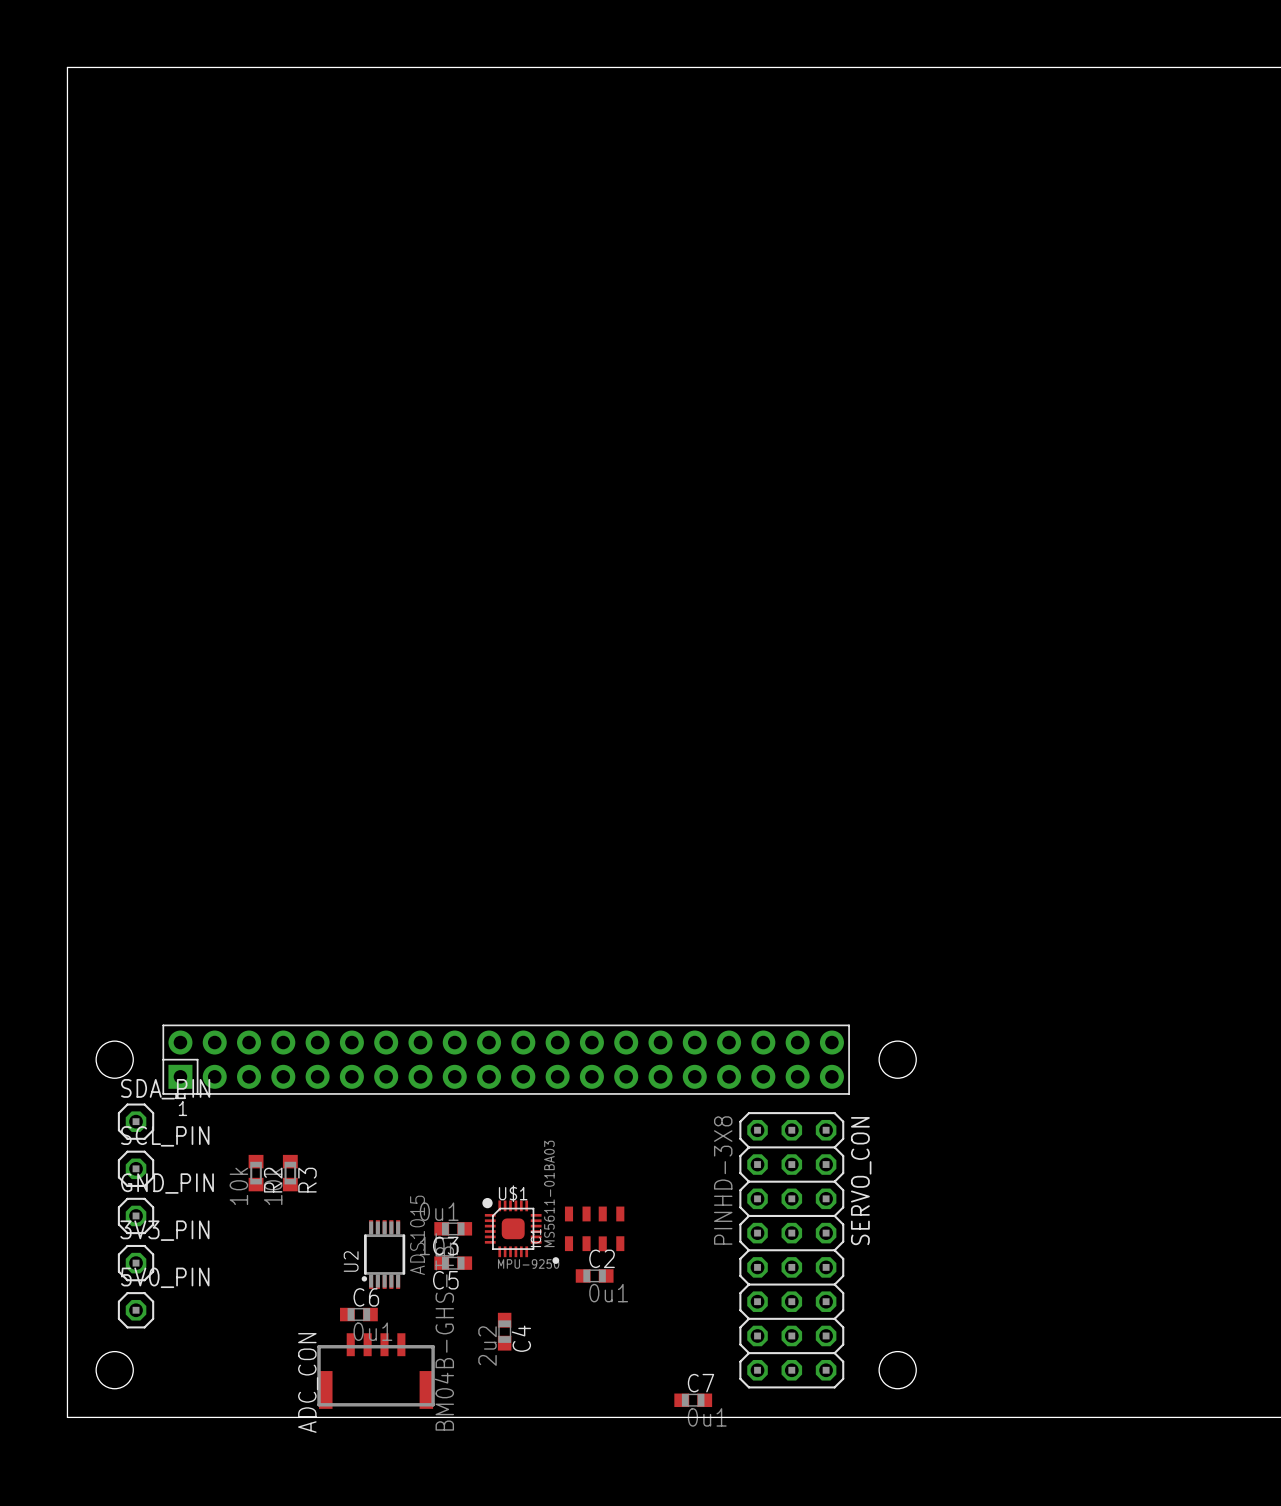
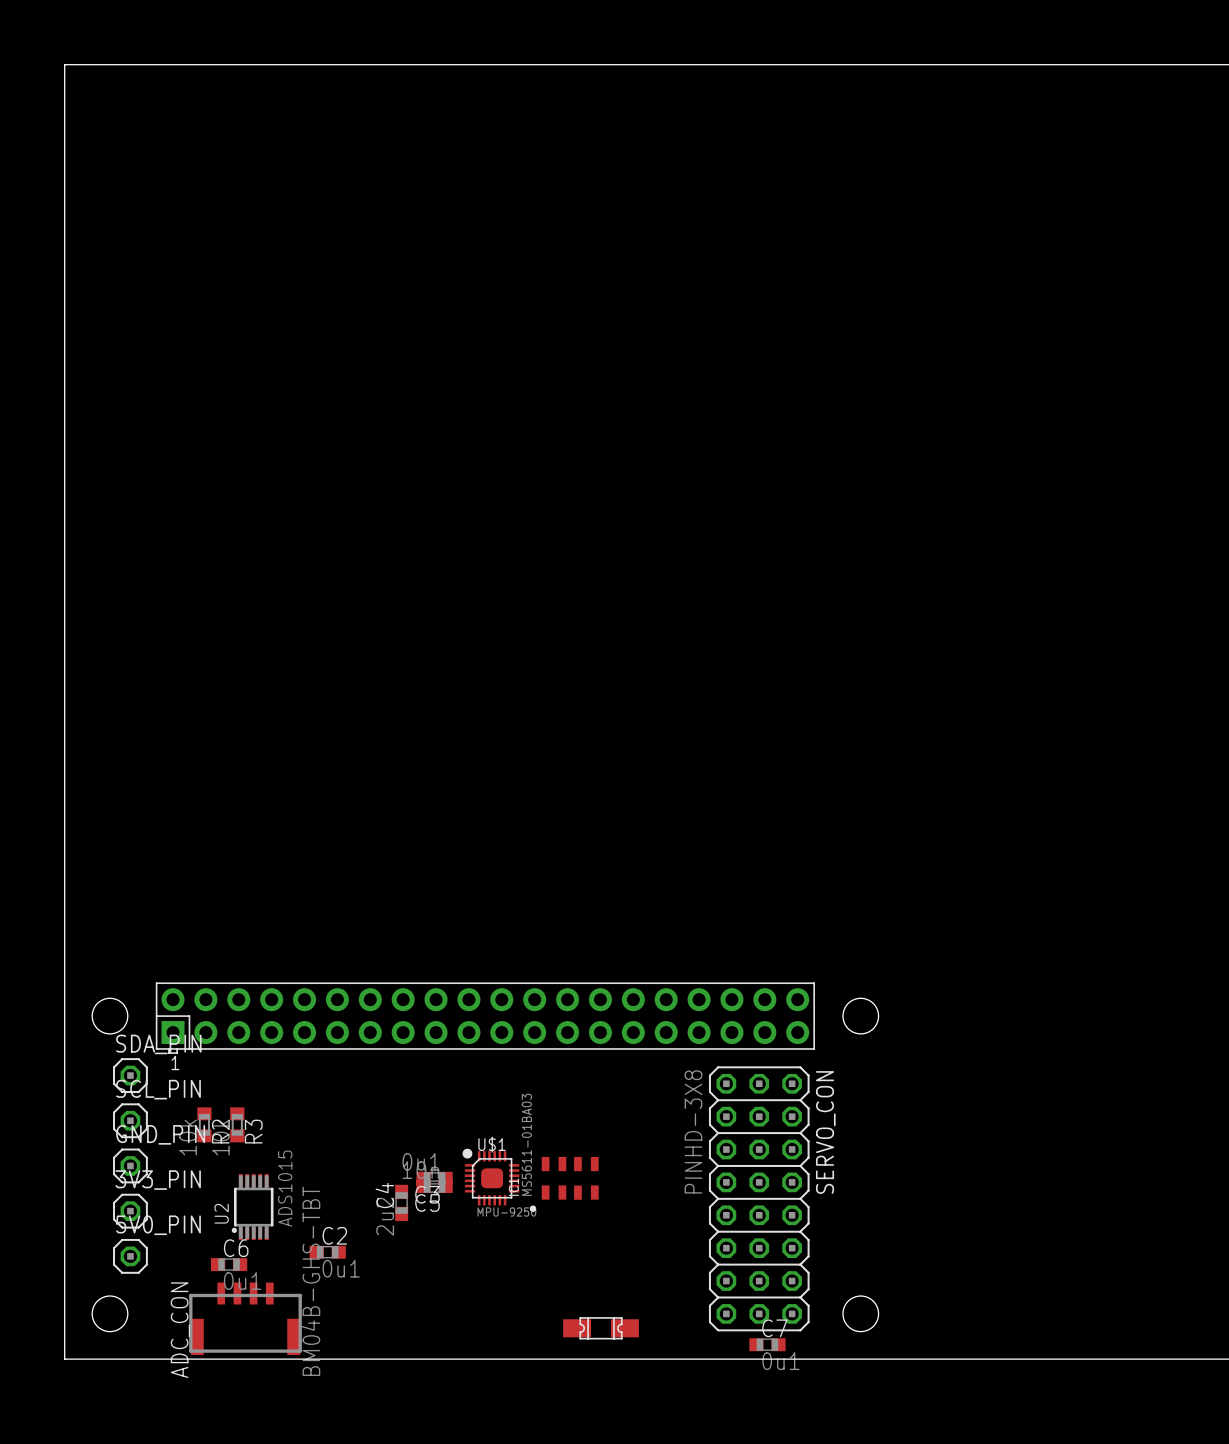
R2 position: (256, 1173) -> (204, 1124)
R3 position: (290, 1173) -> (237, 1124)
U2 position: (383, 1254) -> (252, 1207)
C5 position: (453, 1263) -> (434, 1186)
C2 position: (594, 1275) -> (327, 1252)
C6 position: (358, 1314) -> (229, 1264)
C4 position: (504, 1331) -> (401, 1202)
C4 name position: C4 (521, 1338) -> C4 (384, 1195)
ADC_CON position: (376, 1371) -> (245, 1318)
part: none -> (601, 1328)
C7 position: (693, 1400) -> (767, 1344)

